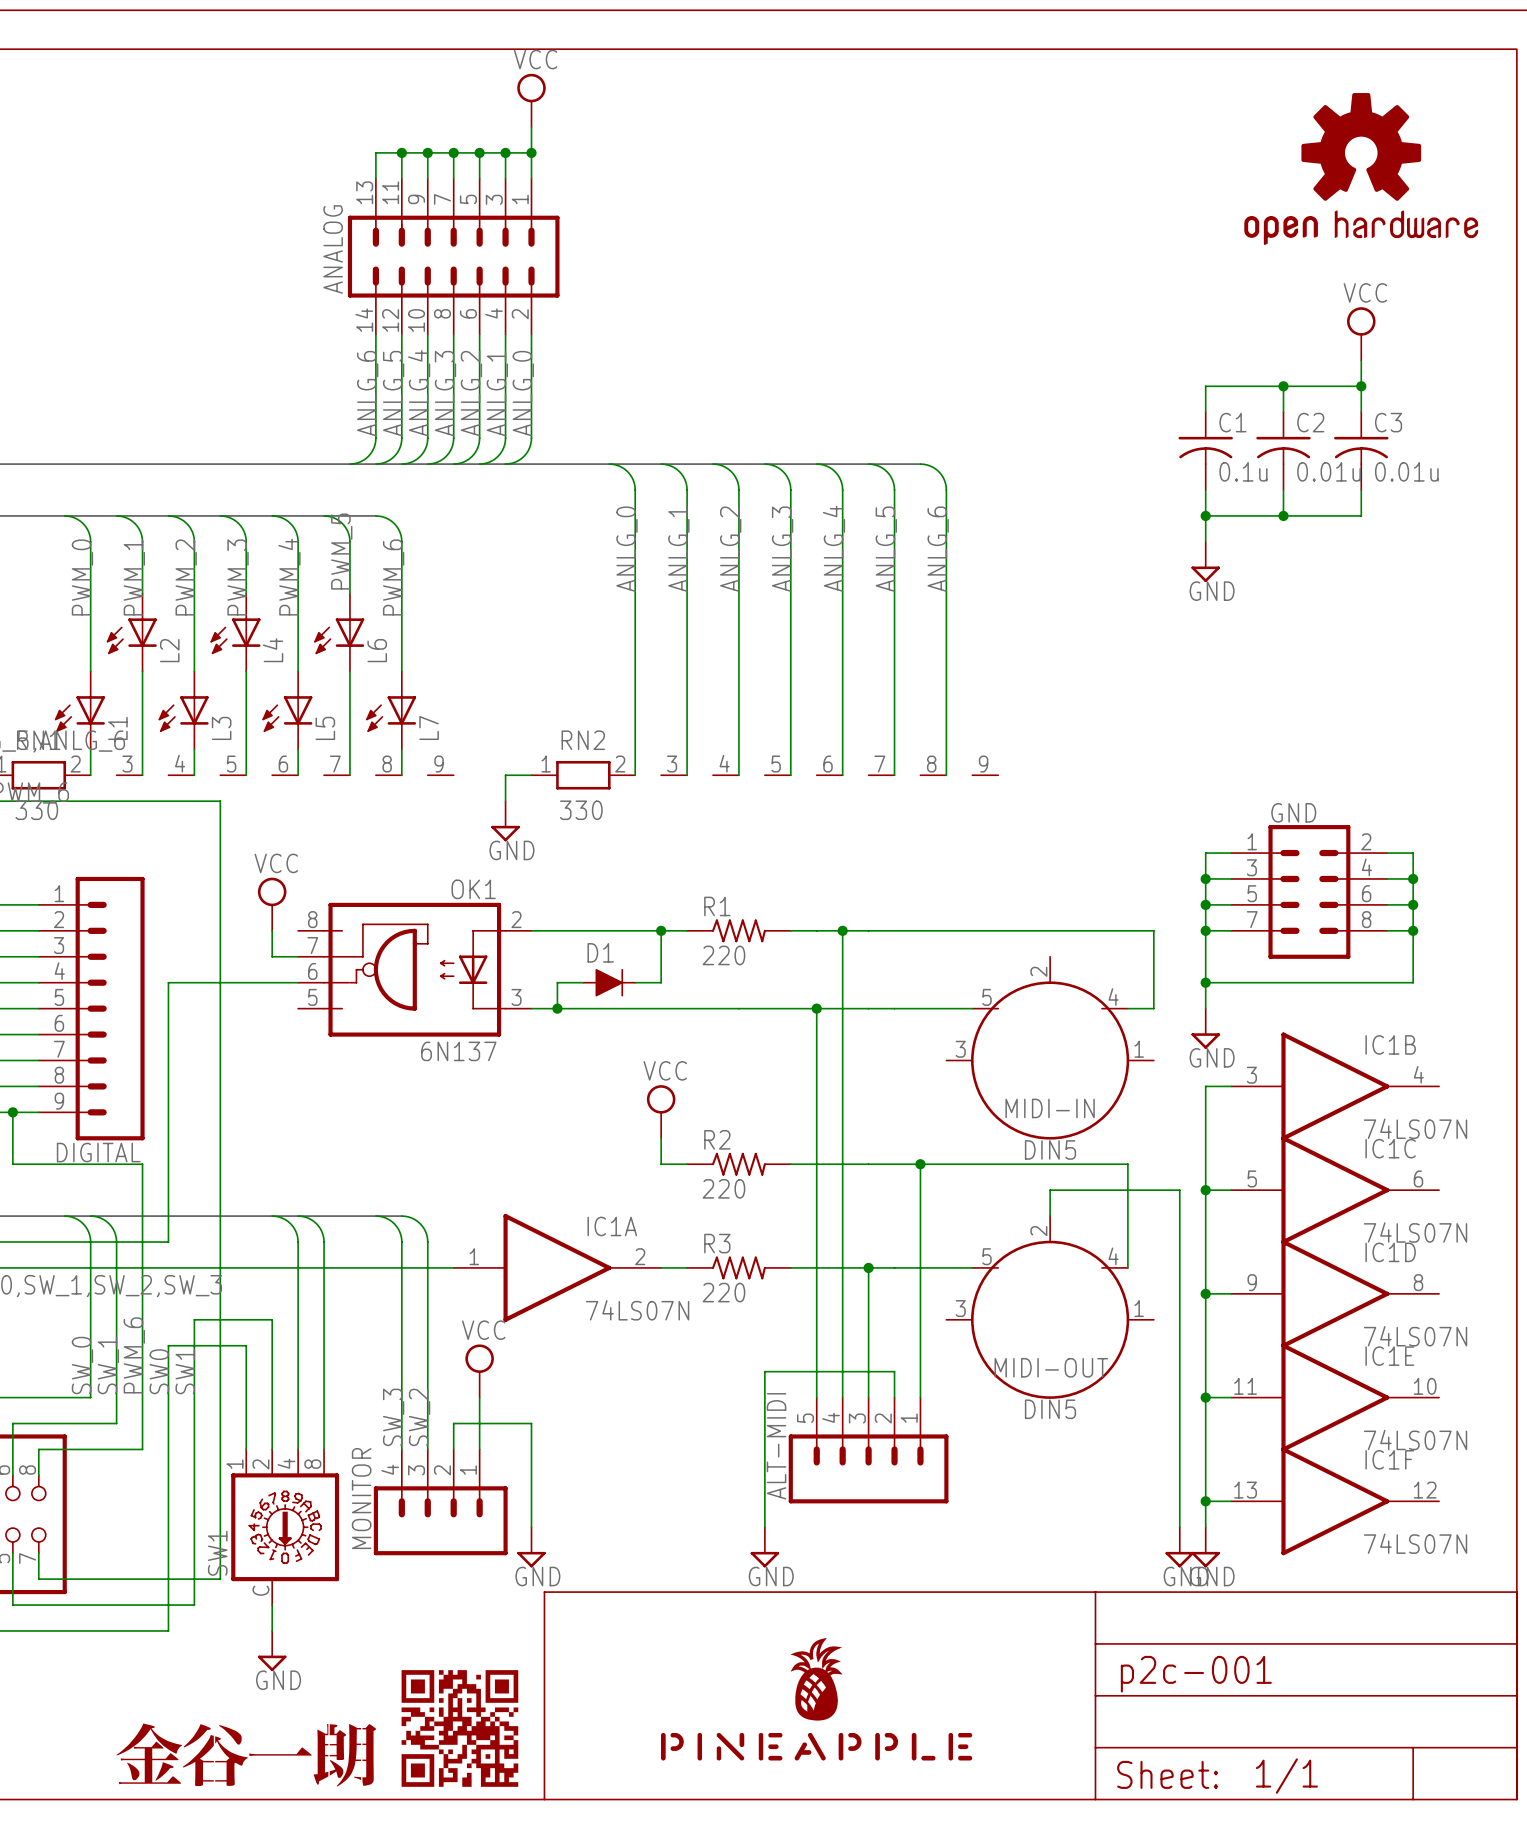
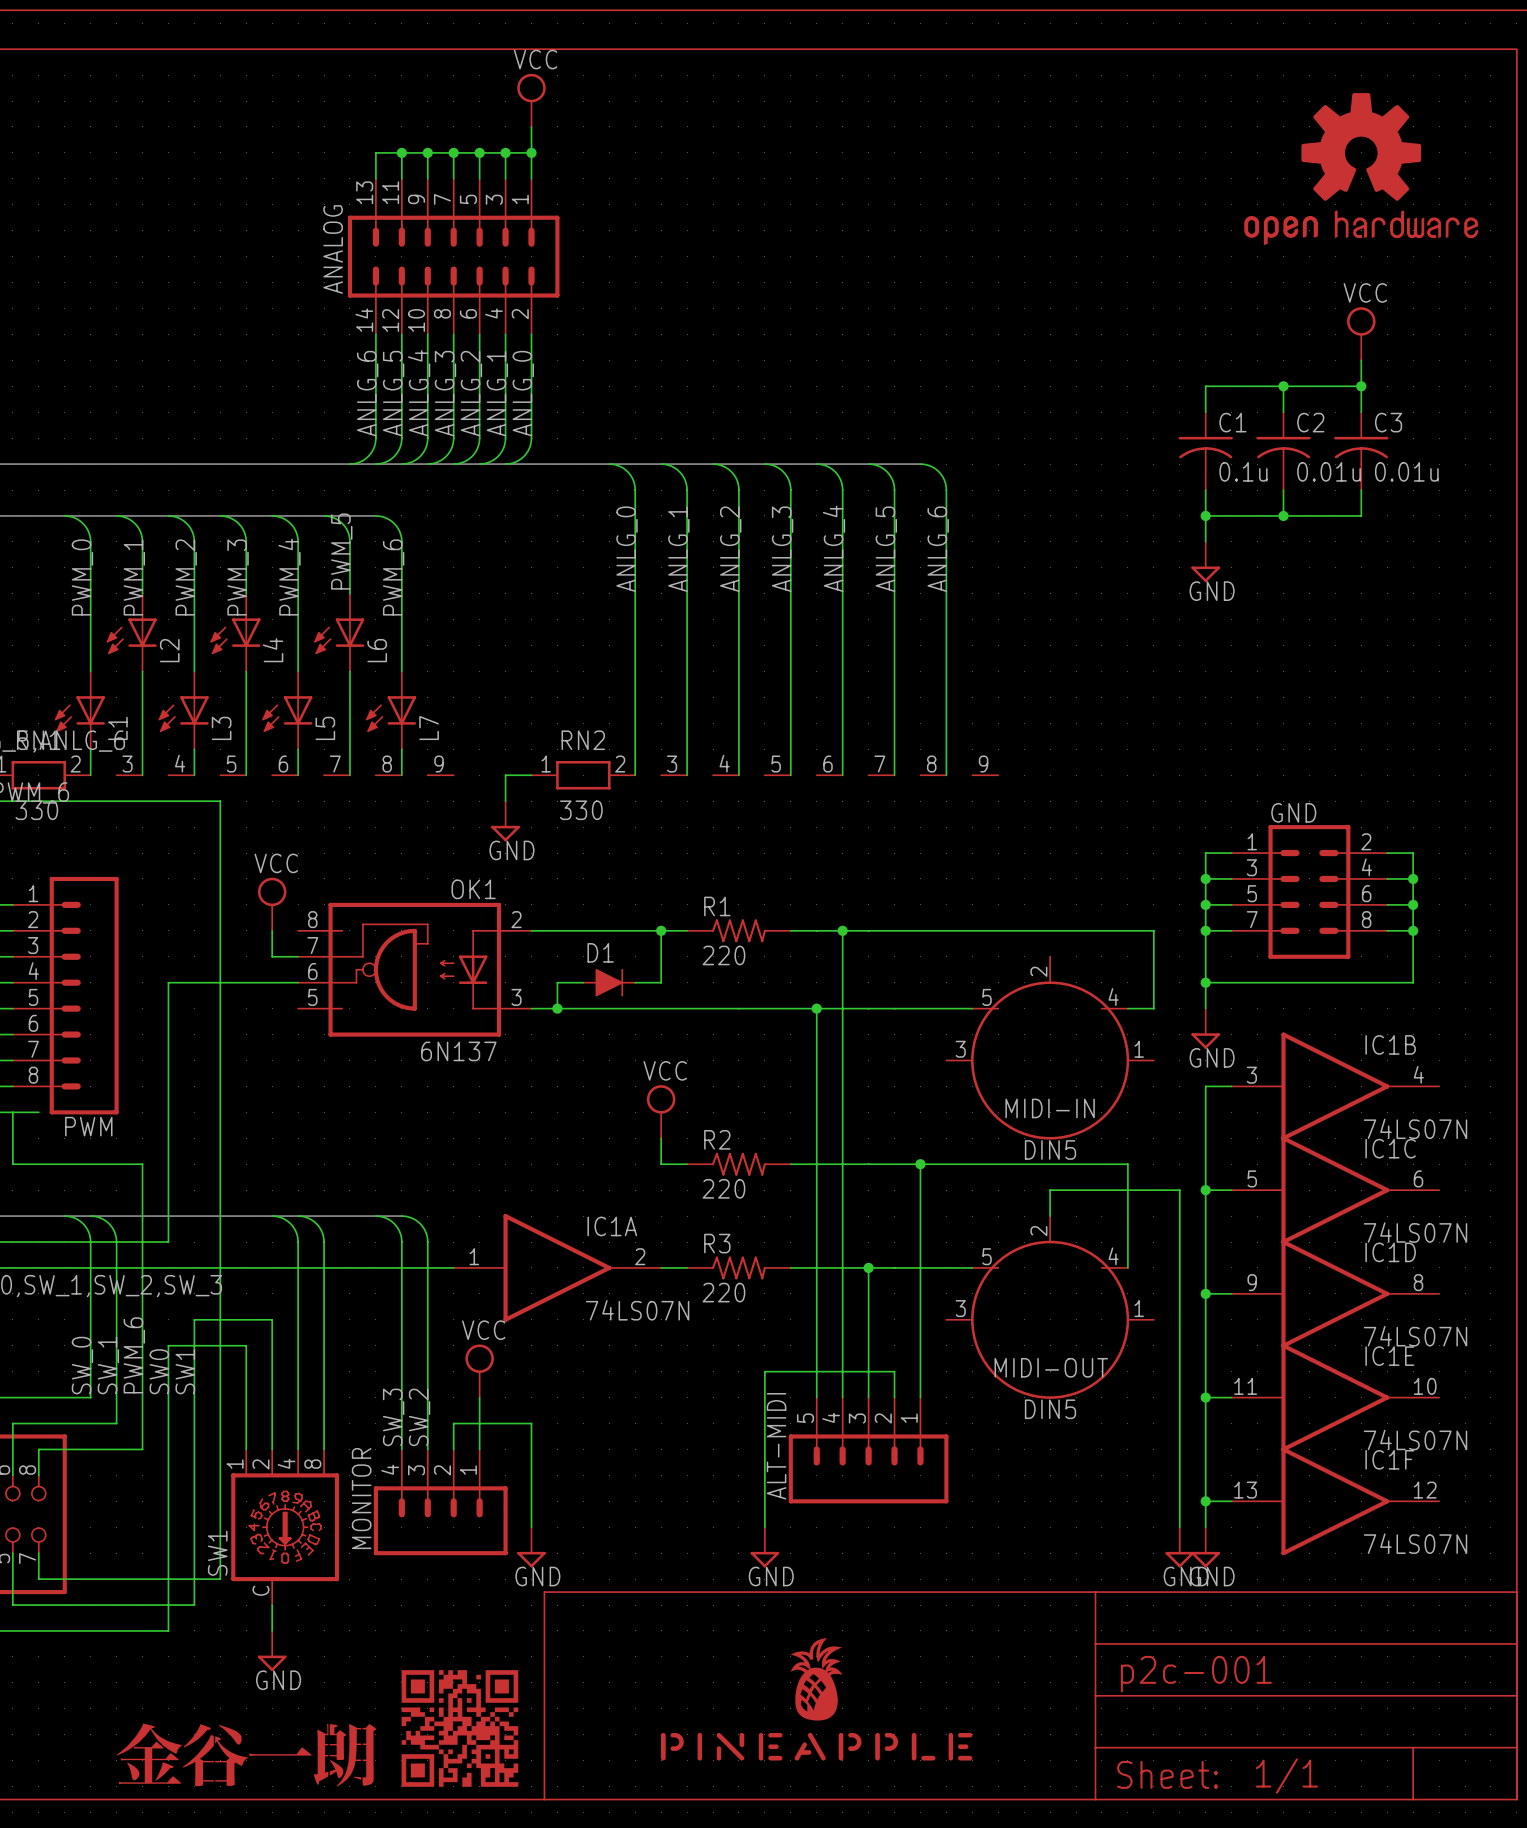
PWM: none -> (65, 995)
DIGITAL: (91, 1008) -> none
junction: (12, 1112) -> none

